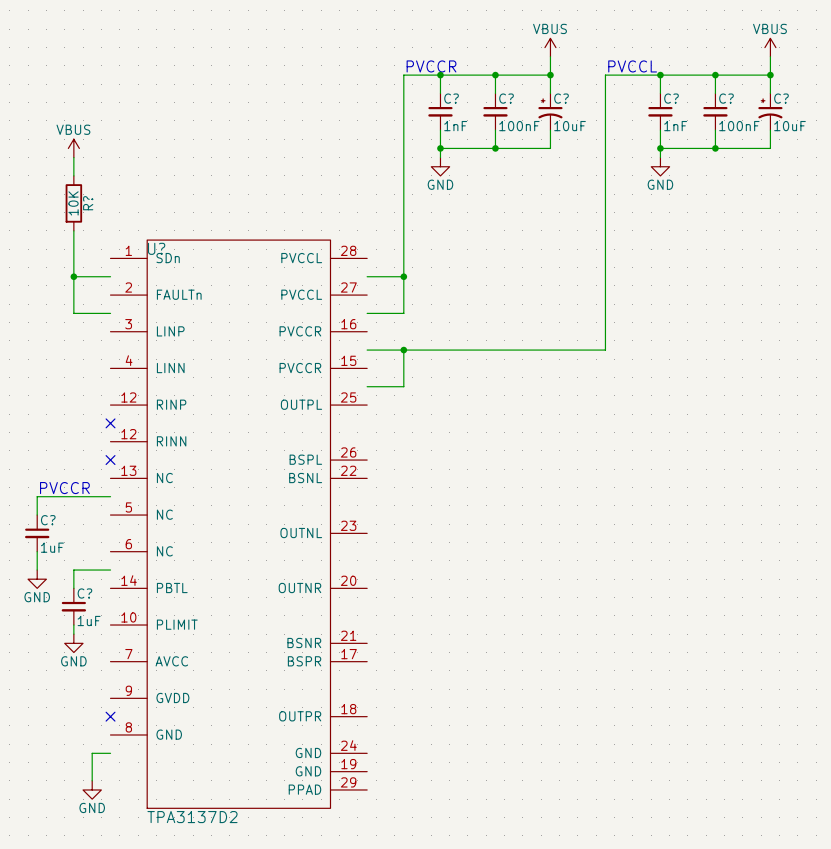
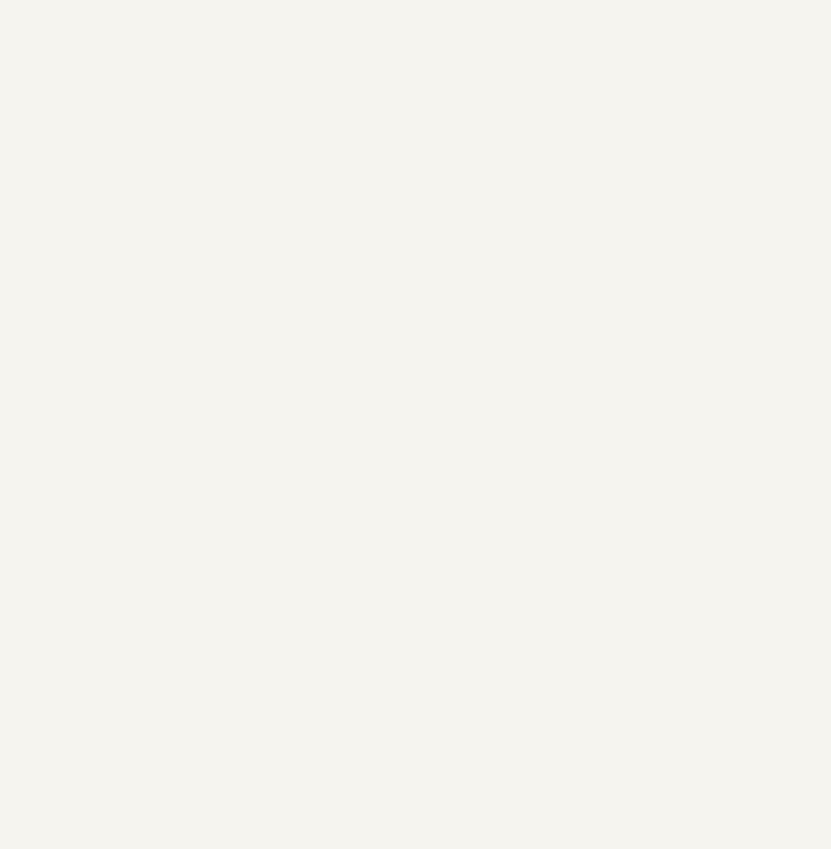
power symbol: VBUS (550, 47) -> none
power symbol: VBUS (770, 47) -> none
wire: (550, 56) (550, 93) -> none
wire: (770, 56) (770, 93) -> none
text: PVCCR (431, 66) -> none
text: PVCCL (632, 66) -> none
wire: (440, 75) (440, 93) -> none
junction: (440, 75) -> none
wire: (495, 75) (495, 93) -> none
junction: (495, 75) -> none
wire: (550, 75) (403, 75) (403, 313) (367, 313) -> none
junction: (550, 75) -> none
wire: (660, 75) (660, 93) -> none
junction: (660, 75) -> none
wire: (715, 75) (715, 93) -> none
junction: (715, 75) -> none
wire: (770, 75) (605, 75) (605, 350) (367, 350) -> none
junction: (770, 75) -> none
C?: 1nF (440, 111) -> none
C?: 100nF (495, 111) -> none
C?: 10uF (550, 111) -> none
C?: 1nF (660, 111) -> none
C?: 100nF (715, 111) -> none
C?: 10uF (770, 111) -> none
wire: (440, 130) (440, 157) -> none
wire: (495, 130) (495, 148) -> none
wire: (550, 130) (550, 148) (440, 148) -> none
wire: (660, 130) (660, 157) -> none
wire: (715, 130) (715, 148) -> none
wire: (770, 130) (770, 148) (660, 148) -> none
power symbol: VBUS (73, 148) -> none
junction: (440, 148) -> none
junction: (495, 148) -> none
junction: (660, 148) -> none
junction: (715, 148) -> none
wire: (73, 157) (73, 175) -> none
power symbol: GND (440, 166) -> none
power symbol: GND (660, 166) -> none
R?: 10K (73, 203) -> none
wire: (73, 230) (73, 313) (110, 313) -> none
wire: (73, 276) (110, 276) -> none
junction: (73, 276) -> none
wire: (367, 276) (403, 276) -> none
junction: (403, 276) -> none
wire: (403, 350) (403, 386) (367, 386) -> none
junction: (403, 350) -> none
no-connect mark: (110, 423) -> none
no-connect mark: (110, 460) -> none
text: PVCCR (64, 488) -> none
wire: (110, 496) (37, 496) (37, 515) -> none
U?: TPA3137D2 (238, 524) -> none
C?: 1uF (37, 533) -> none
wire: (37, 551) (37, 570) -> none
wire: (110, 570) (73, 570) (73, 588) -> none
power symbol: GND (37, 579) -> none
C?: 1uF (73, 606) -> none
wire: (73, 625) (73, 634) -> none
power symbol: GND (73, 643) -> none
no-connect mark: (110, 716) -> none
wire: (110, 753) (92, 753) (92, 780) -> none
power symbol: GND (92, 789) -> none

